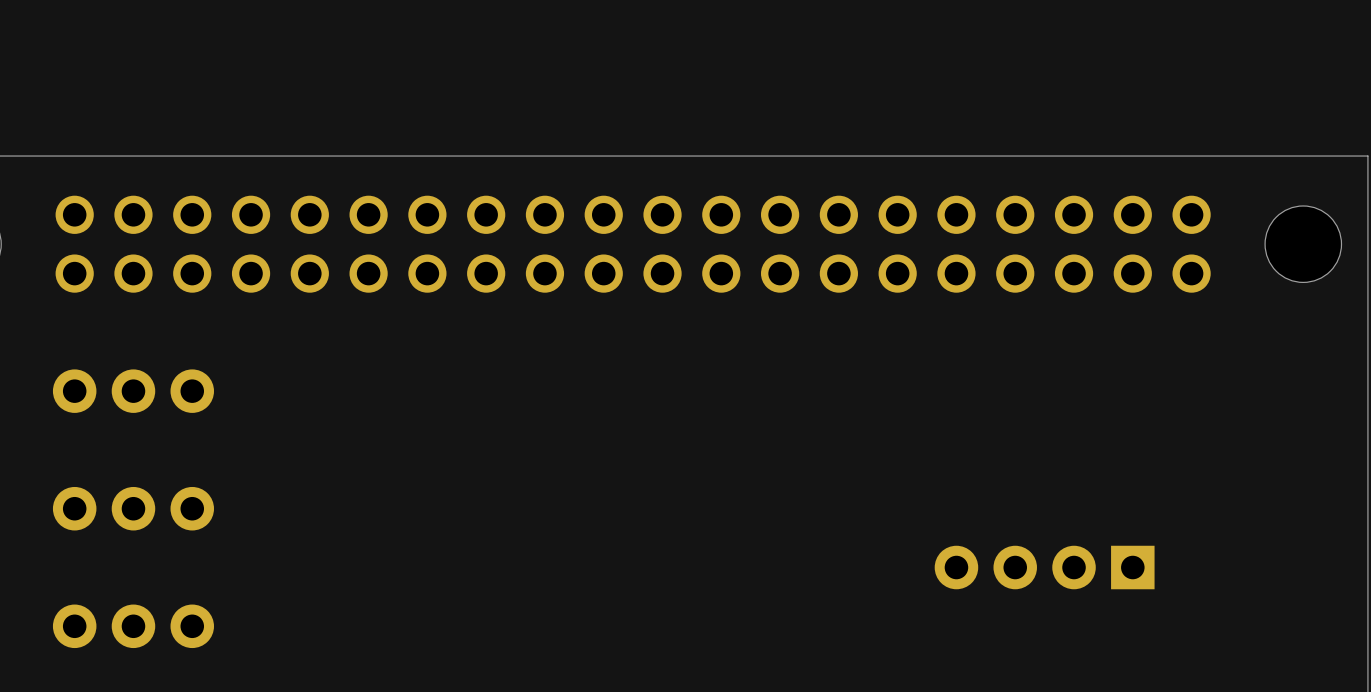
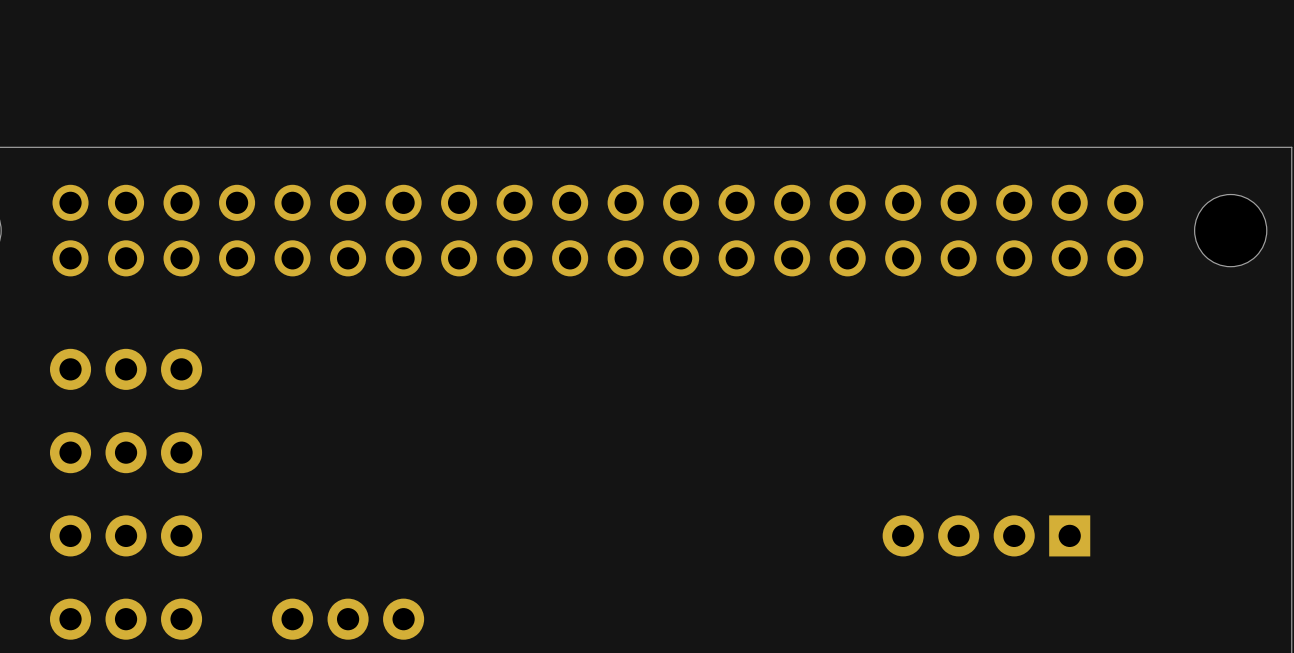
part: none -> (126, 452)
part: (133, 508) -> none
part: none -> (126, 535)
part: (133, 626) -> none
part: none -> (126, 619)
part: none -> (348, 619)

